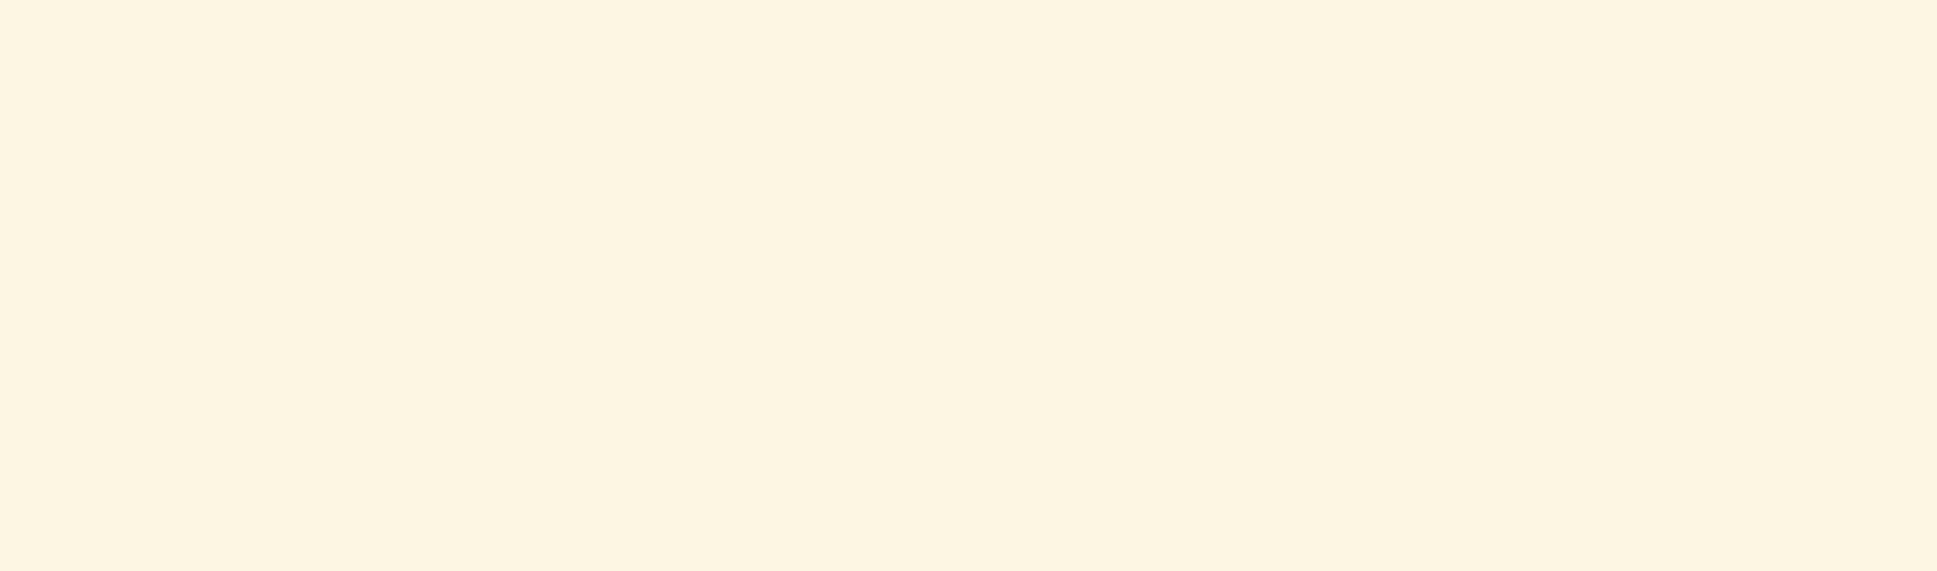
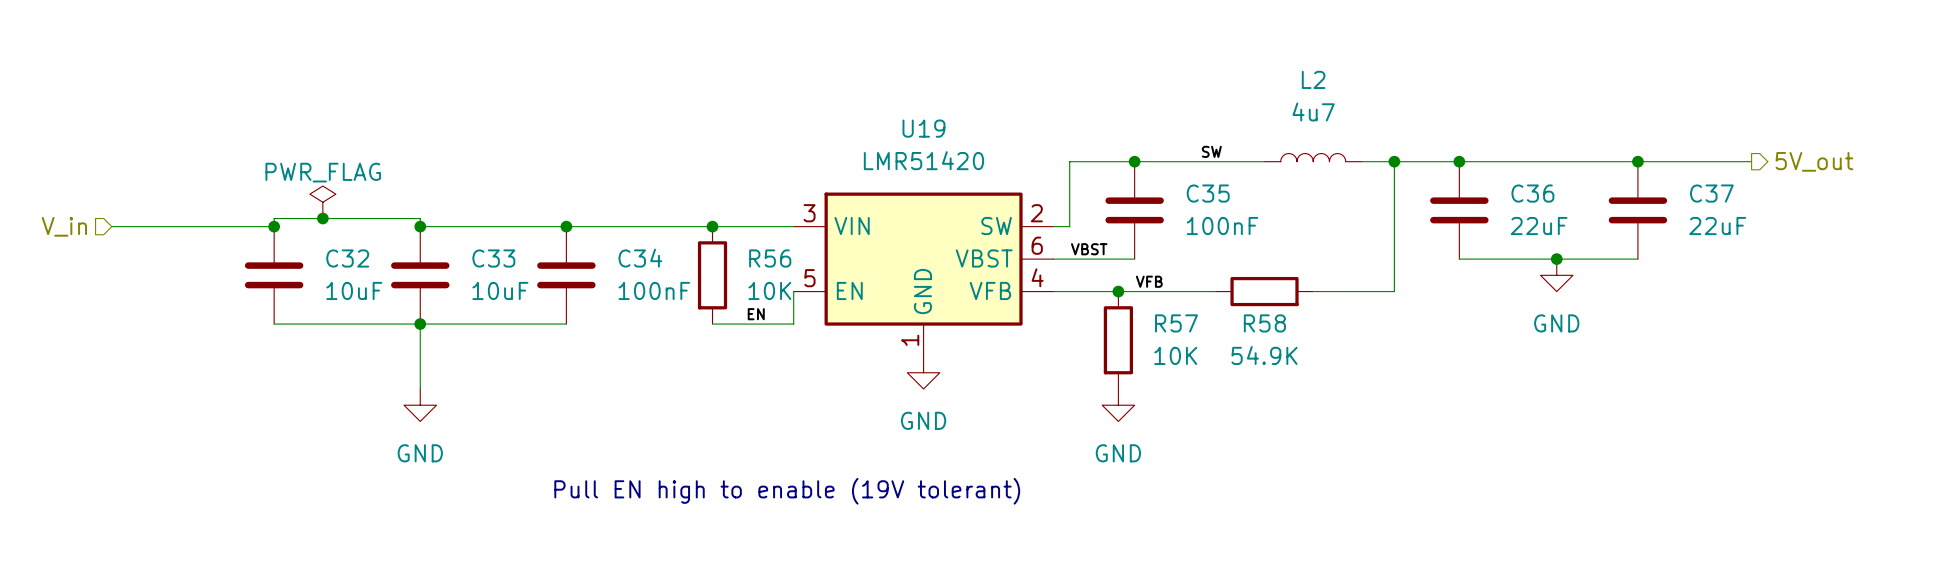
label: none -> SW (1211, 151)
L2: none -> 4u7 (1313, 157)
junction: none -> (1134, 161)
wire: none -> (1264, 161) (1069, 161) (1069, 226) (1053, 226)
wire: none -> (1361, 161) (1751, 161)
wire: none -> (1394, 161) (1394, 291) (1313, 291)
junction: none -> (1394, 161)
junction: none -> (1459, 161)
junction: none -> (1637, 161)
hierarchical label: none -> 5V_out (1814, 161)
power symbol: none -> PWR_FLAG (322, 202)
C35: none -> 100nF (1134, 210)
C36: none -> 22uF (1459, 210)
C37: none -> 22uF (1637, 210)
junction: none -> (322, 218)
hierarchical label: none -> V_in (64, 226)
wire: none -> (111, 226) (274, 226) (274, 218) (420, 218) (420, 226) (793, 226)
junction: none -> (274, 226)
junction: none -> (420, 226)
junction: none -> (566, 226)
junction: none -> (712, 226)
label: none -> VBST (1089, 249)
wire: none -> (1053, 259) (1134, 259)
wire: none -> (1459, 259) (1637, 259)
junction: none -> (1556, 259)
U19: none -> LMR51420 (923, 274)
C32: none -> 10uF (274, 275)
C33: none -> 10uF (420, 275)
C34: none -> 100nF (566, 275)
R56: none -> 10K (712, 275)
power symbol: none -> GND (1556, 275)
label: none -> VFB (1149, 281)
wire: none -> (793, 291) (793, 324) (712, 324)
wire: none -> (1053, 291) (1215, 291)
junction: none -> (1118, 291)
R58: none -> 54.9K (1264, 291)
label: none -> EN (756, 314)
wire: none -> (274, 324) (566, 324)
wire: none -> (420, 324) (420, 388)
junction: none -> (420, 324)
R57: none -> 10K (1118, 340)
power symbol: none -> GND (923, 372)
power symbol: none -> GND (420, 405)
power symbol: none -> GND (1118, 405)
text: none -> Pull EN high to enable (19V tolerant) (787, 491)

